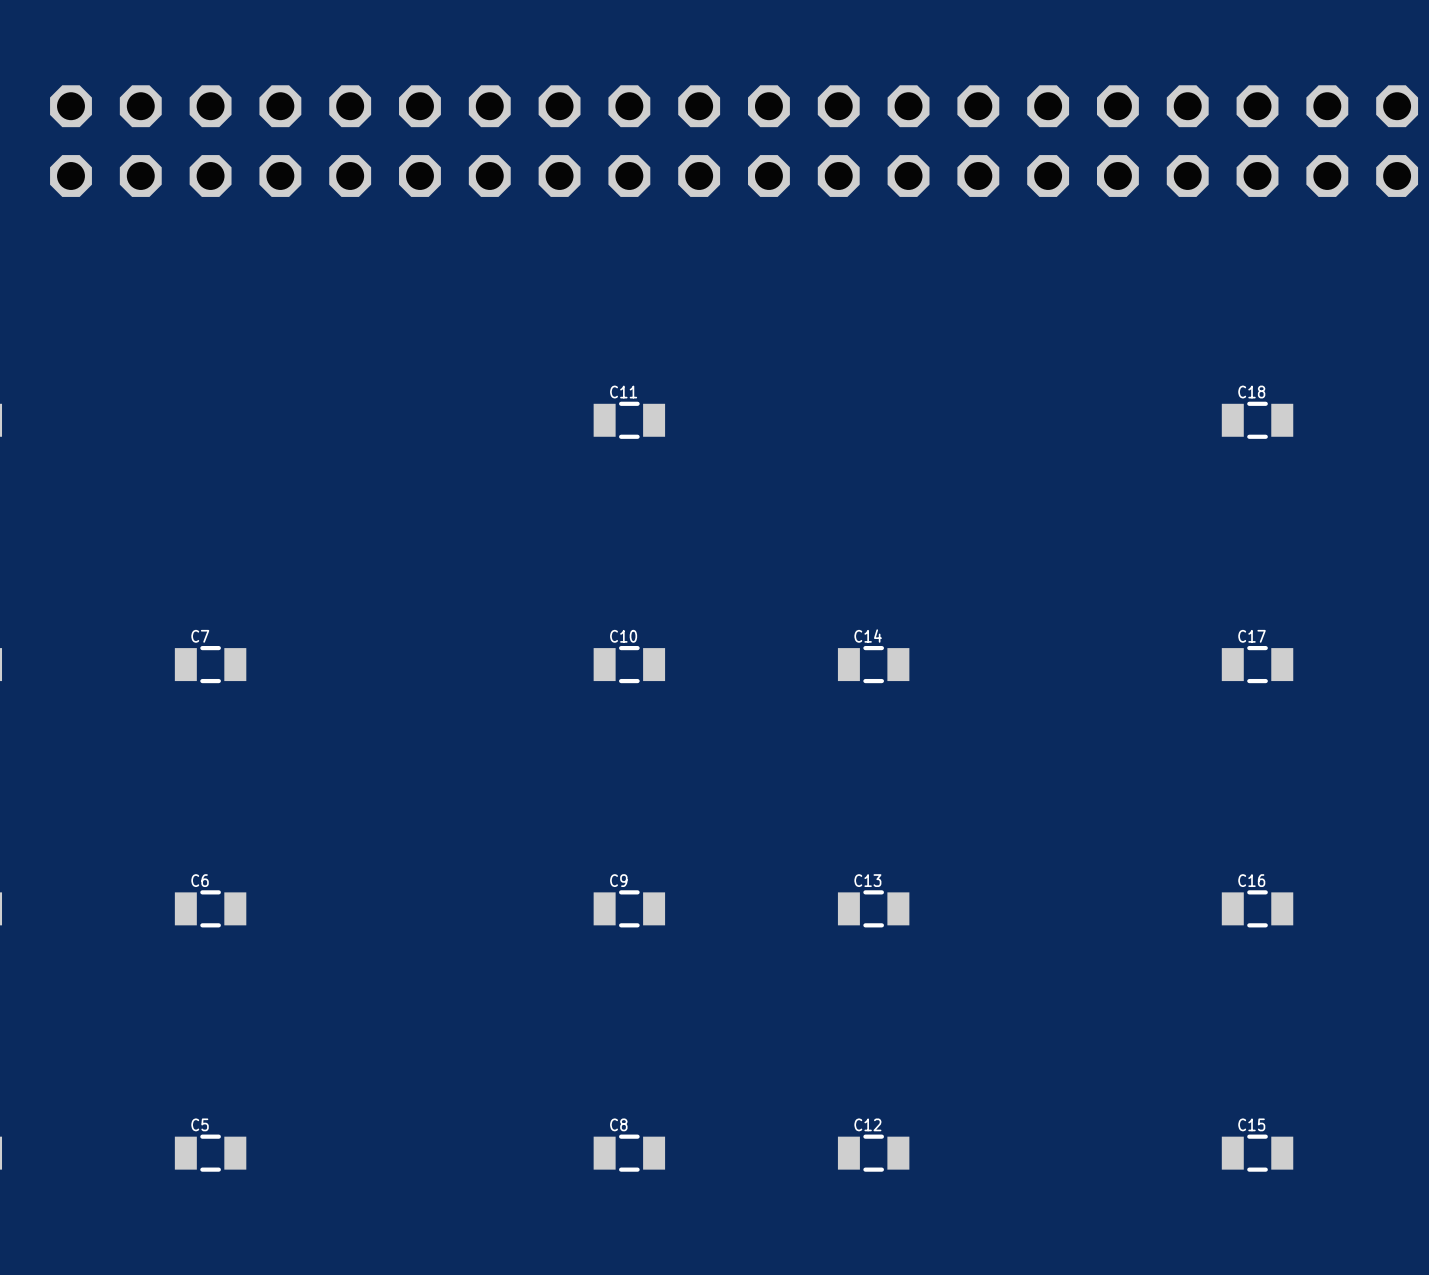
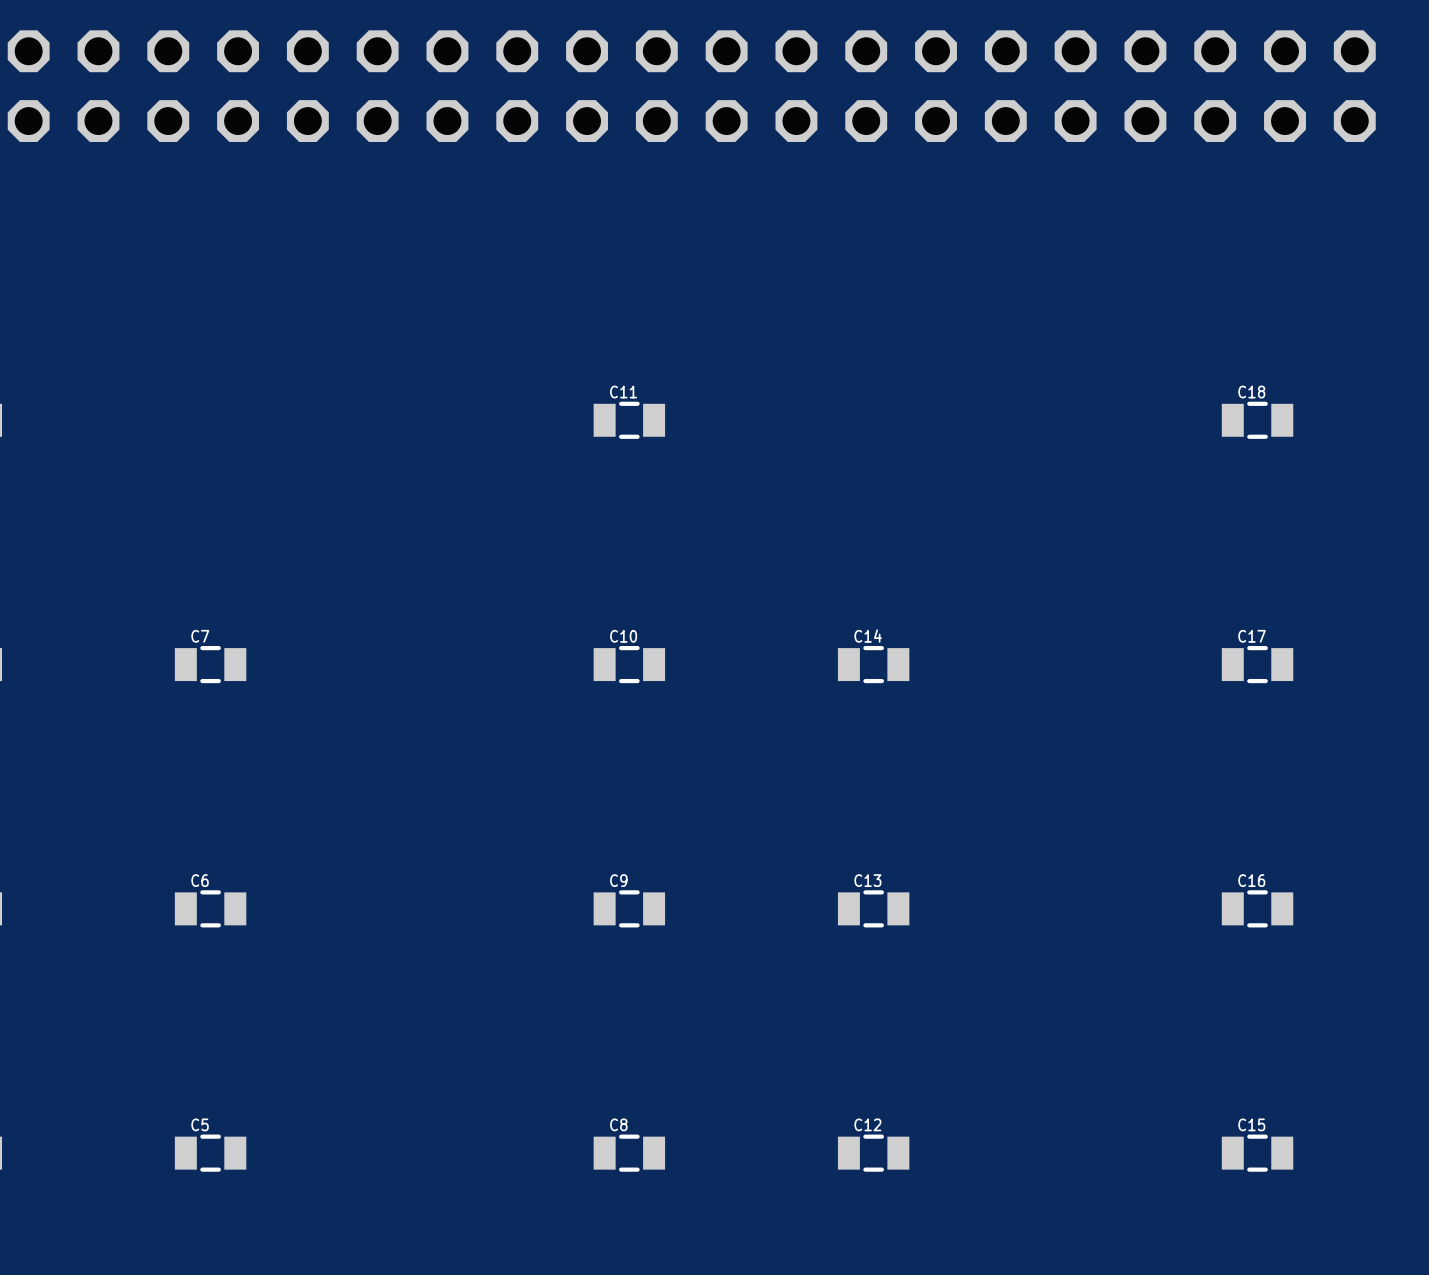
part position: (734, 141) -> (691, 86)

